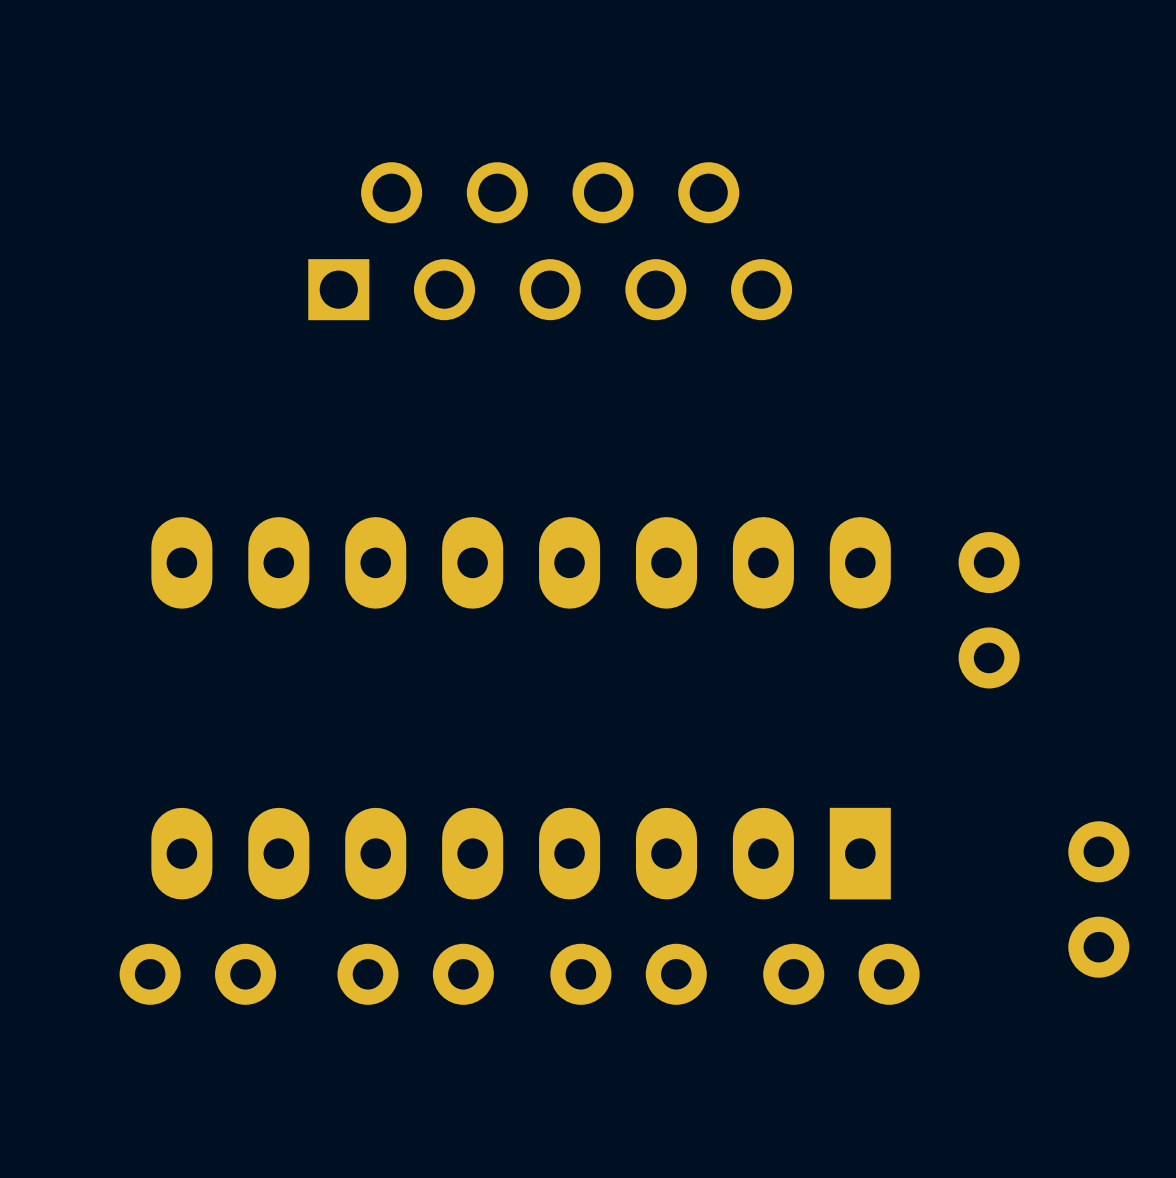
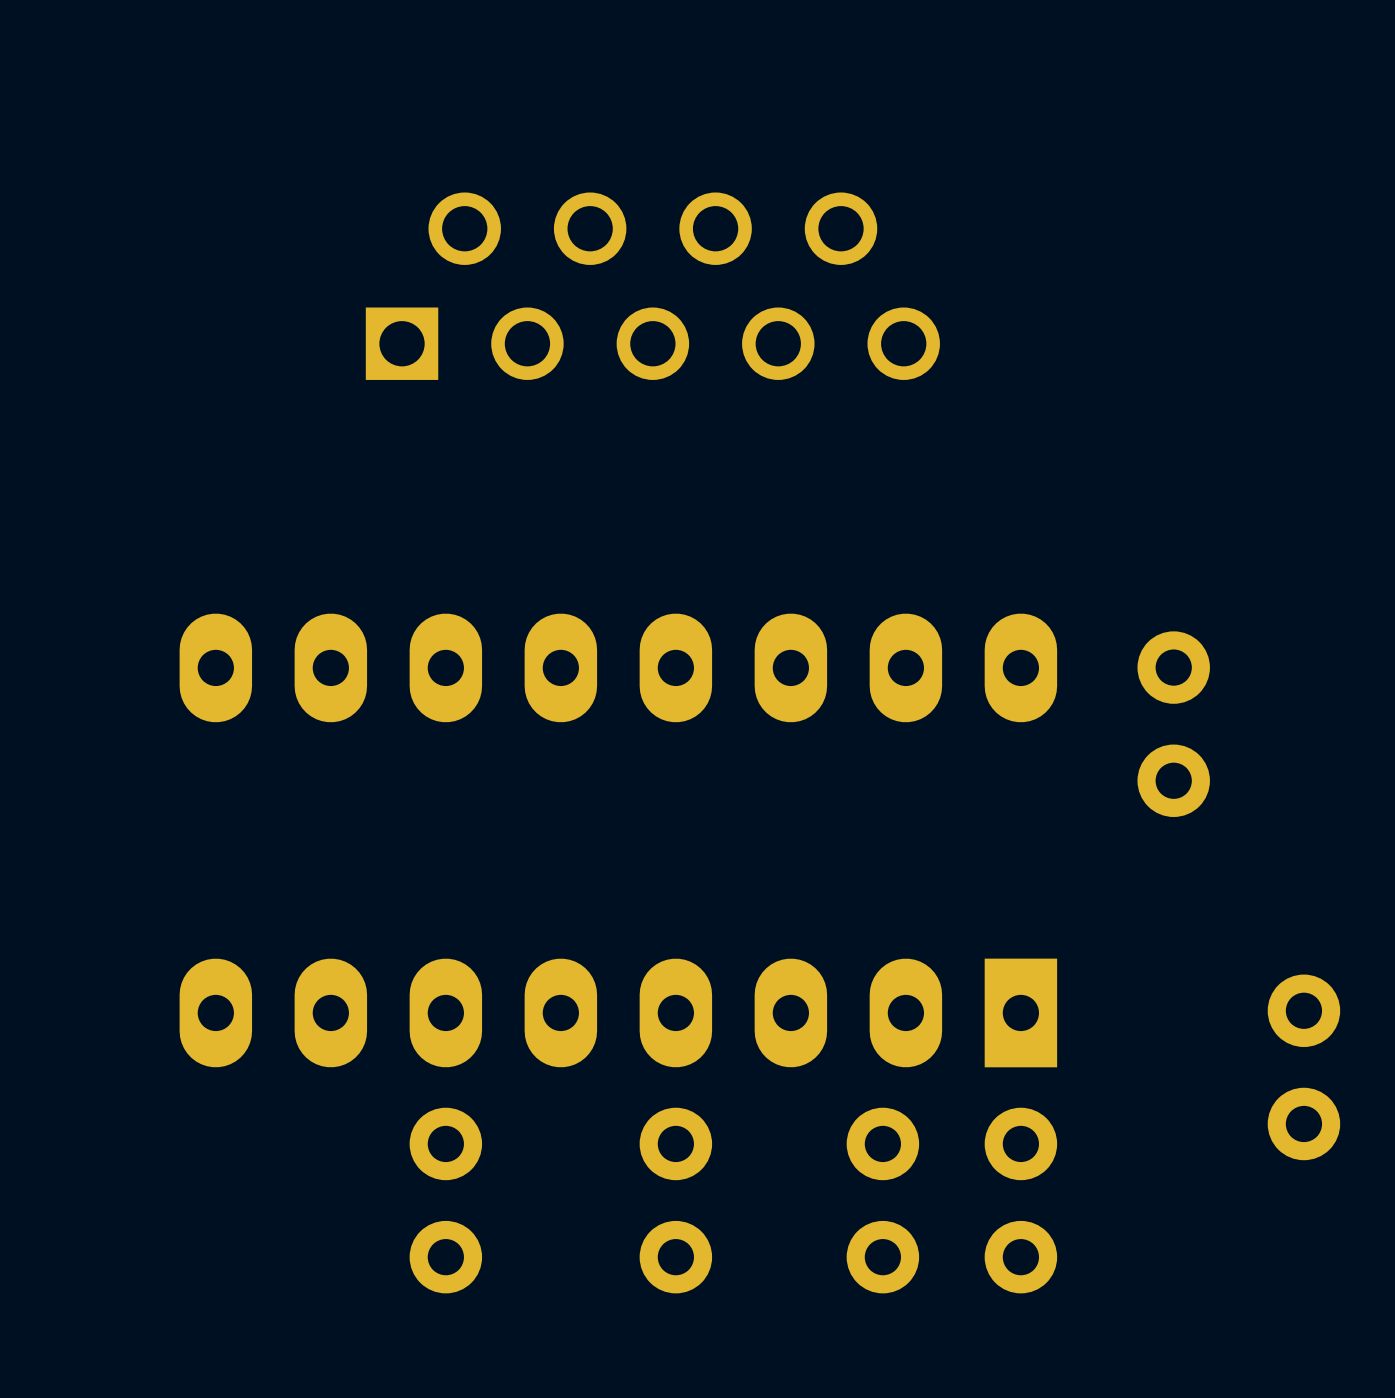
part: (197, 974) -> none
part rotation: 0° (415, 974) -> 90° clockwise (445, 1200)
part: (628, 974) -> none
part rotation: 0° (841, 974) -> 90° clockwise (1020, 1200)
part: none -> (675, 1200)
part: none -> (882, 1200)

